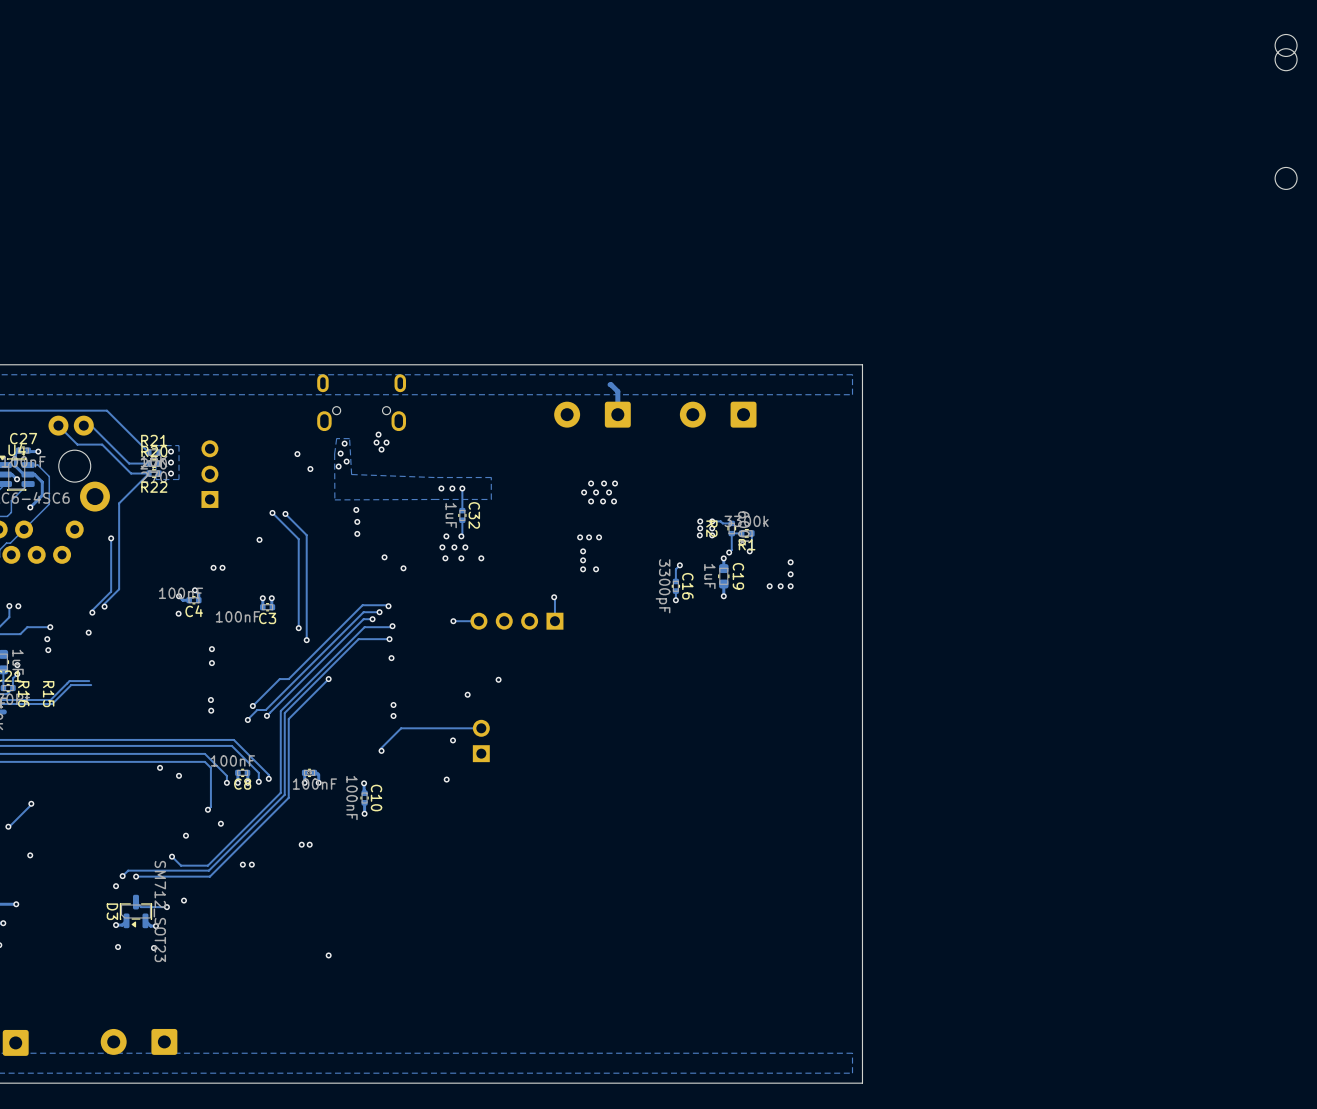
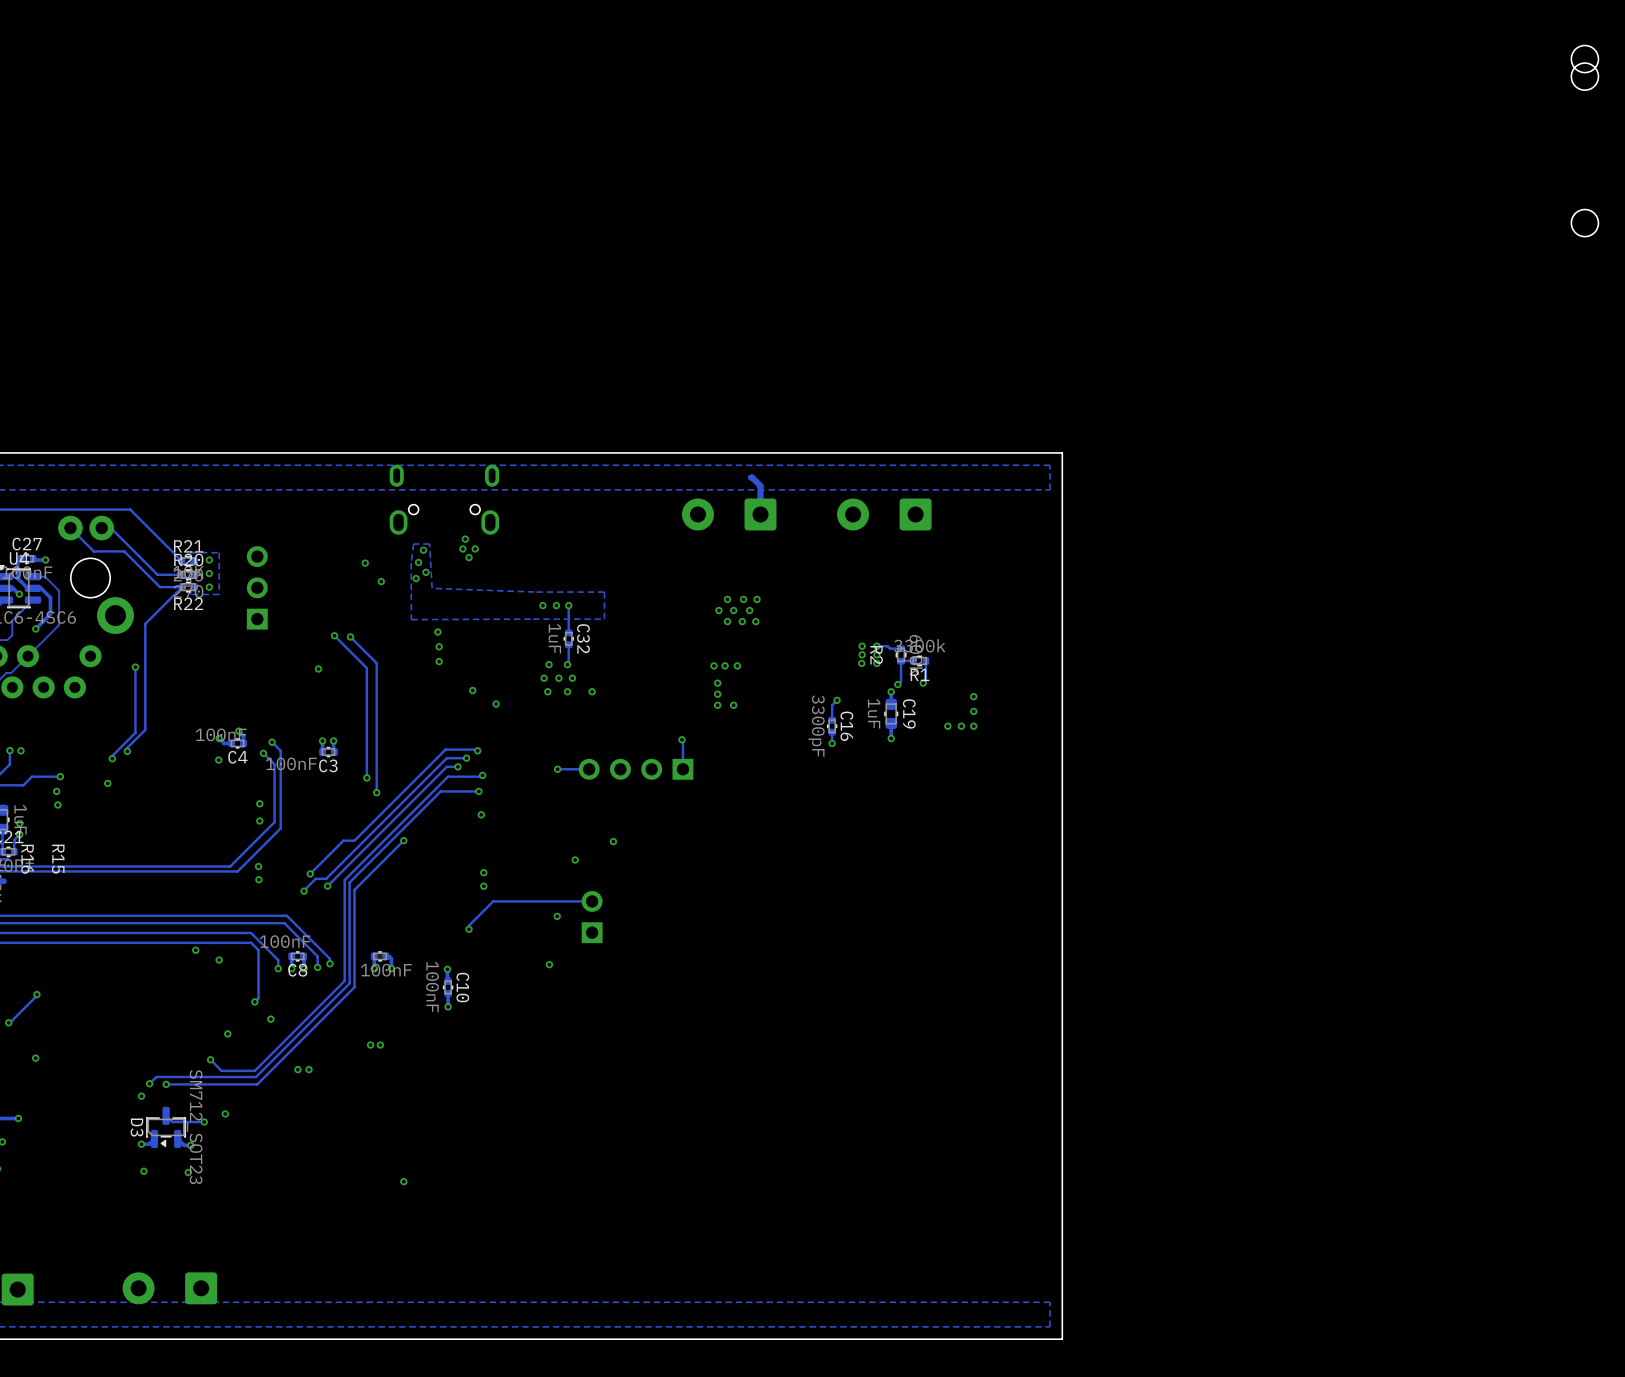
via: (213, 567) -> none
via: (222, 567) -> none
via: none -> (272, 742)
via: none -> (263, 753)
track: (89, 681) (69, 681) (50, 700) -> (263, 753) (274, 764) (274, 822) (230, 866) (60, 866)
track: (91, 685) (71, 685) (52, 704) -> (272, 742) (280, 750) (280, 828) (237, 871) (62, 871)

